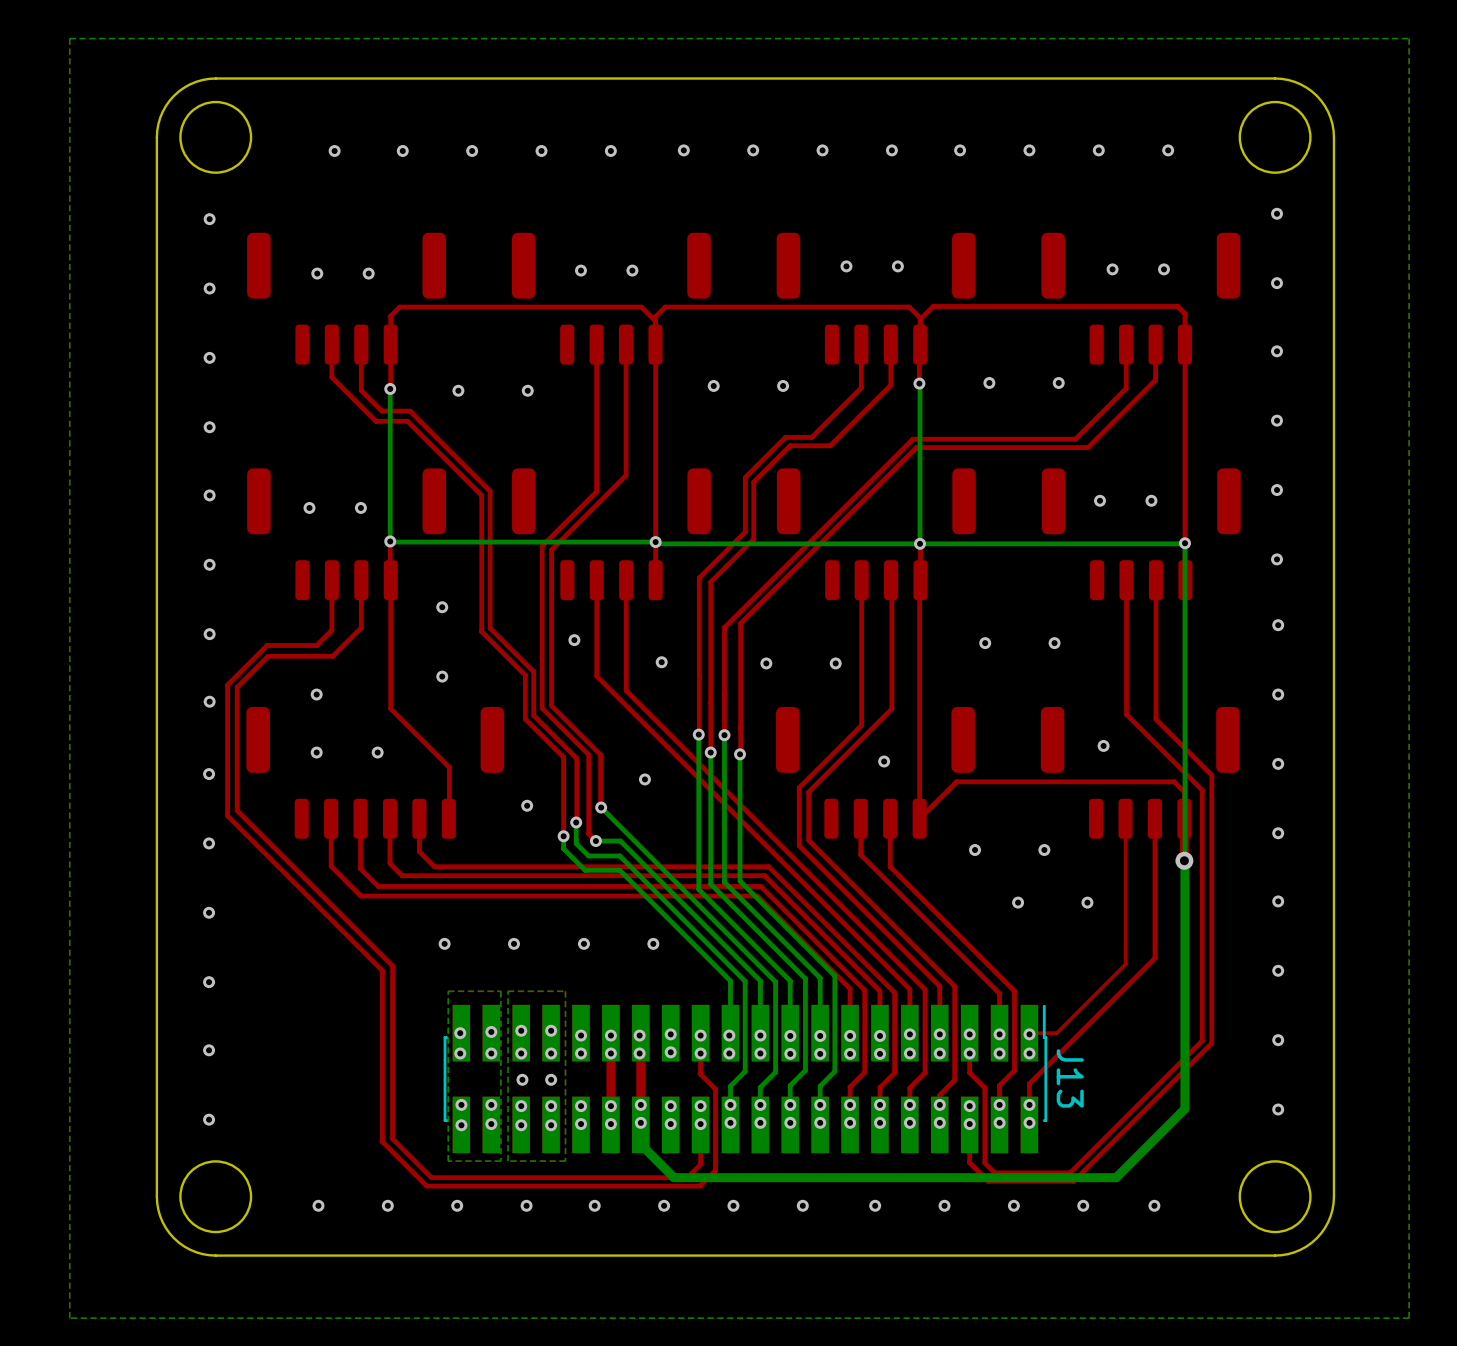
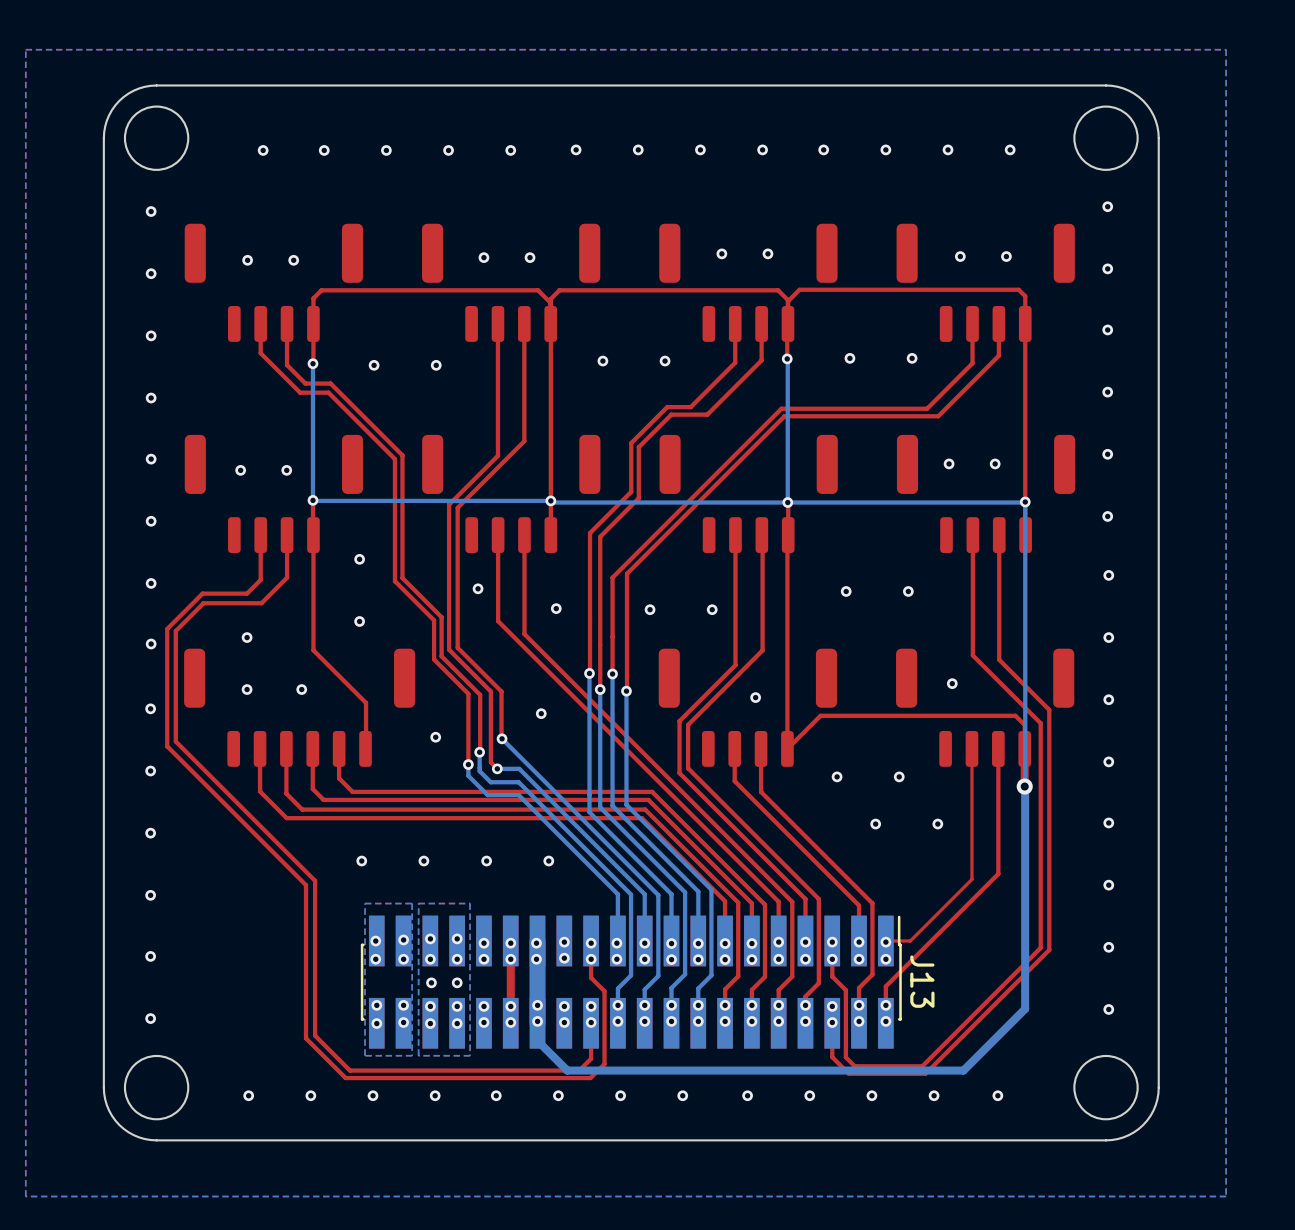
bottom track: none -> (537, 940) (537, 1023)

